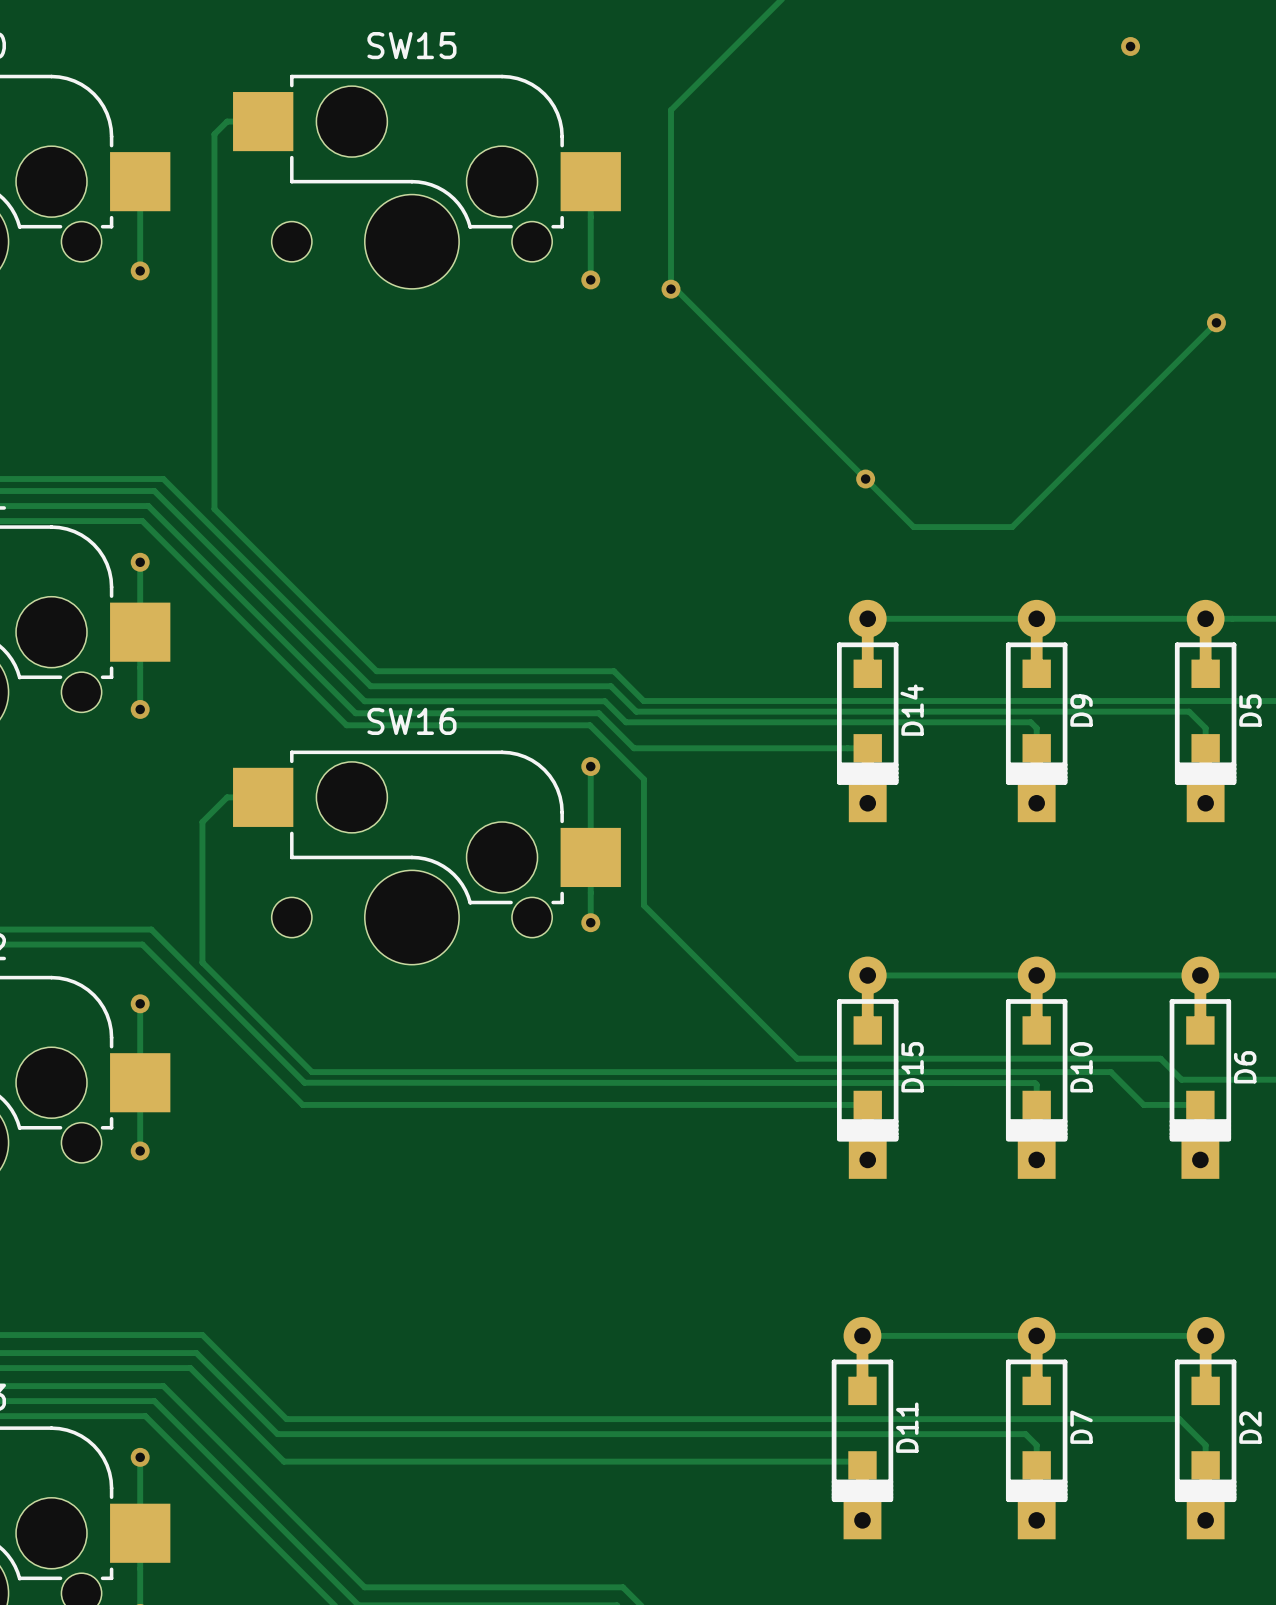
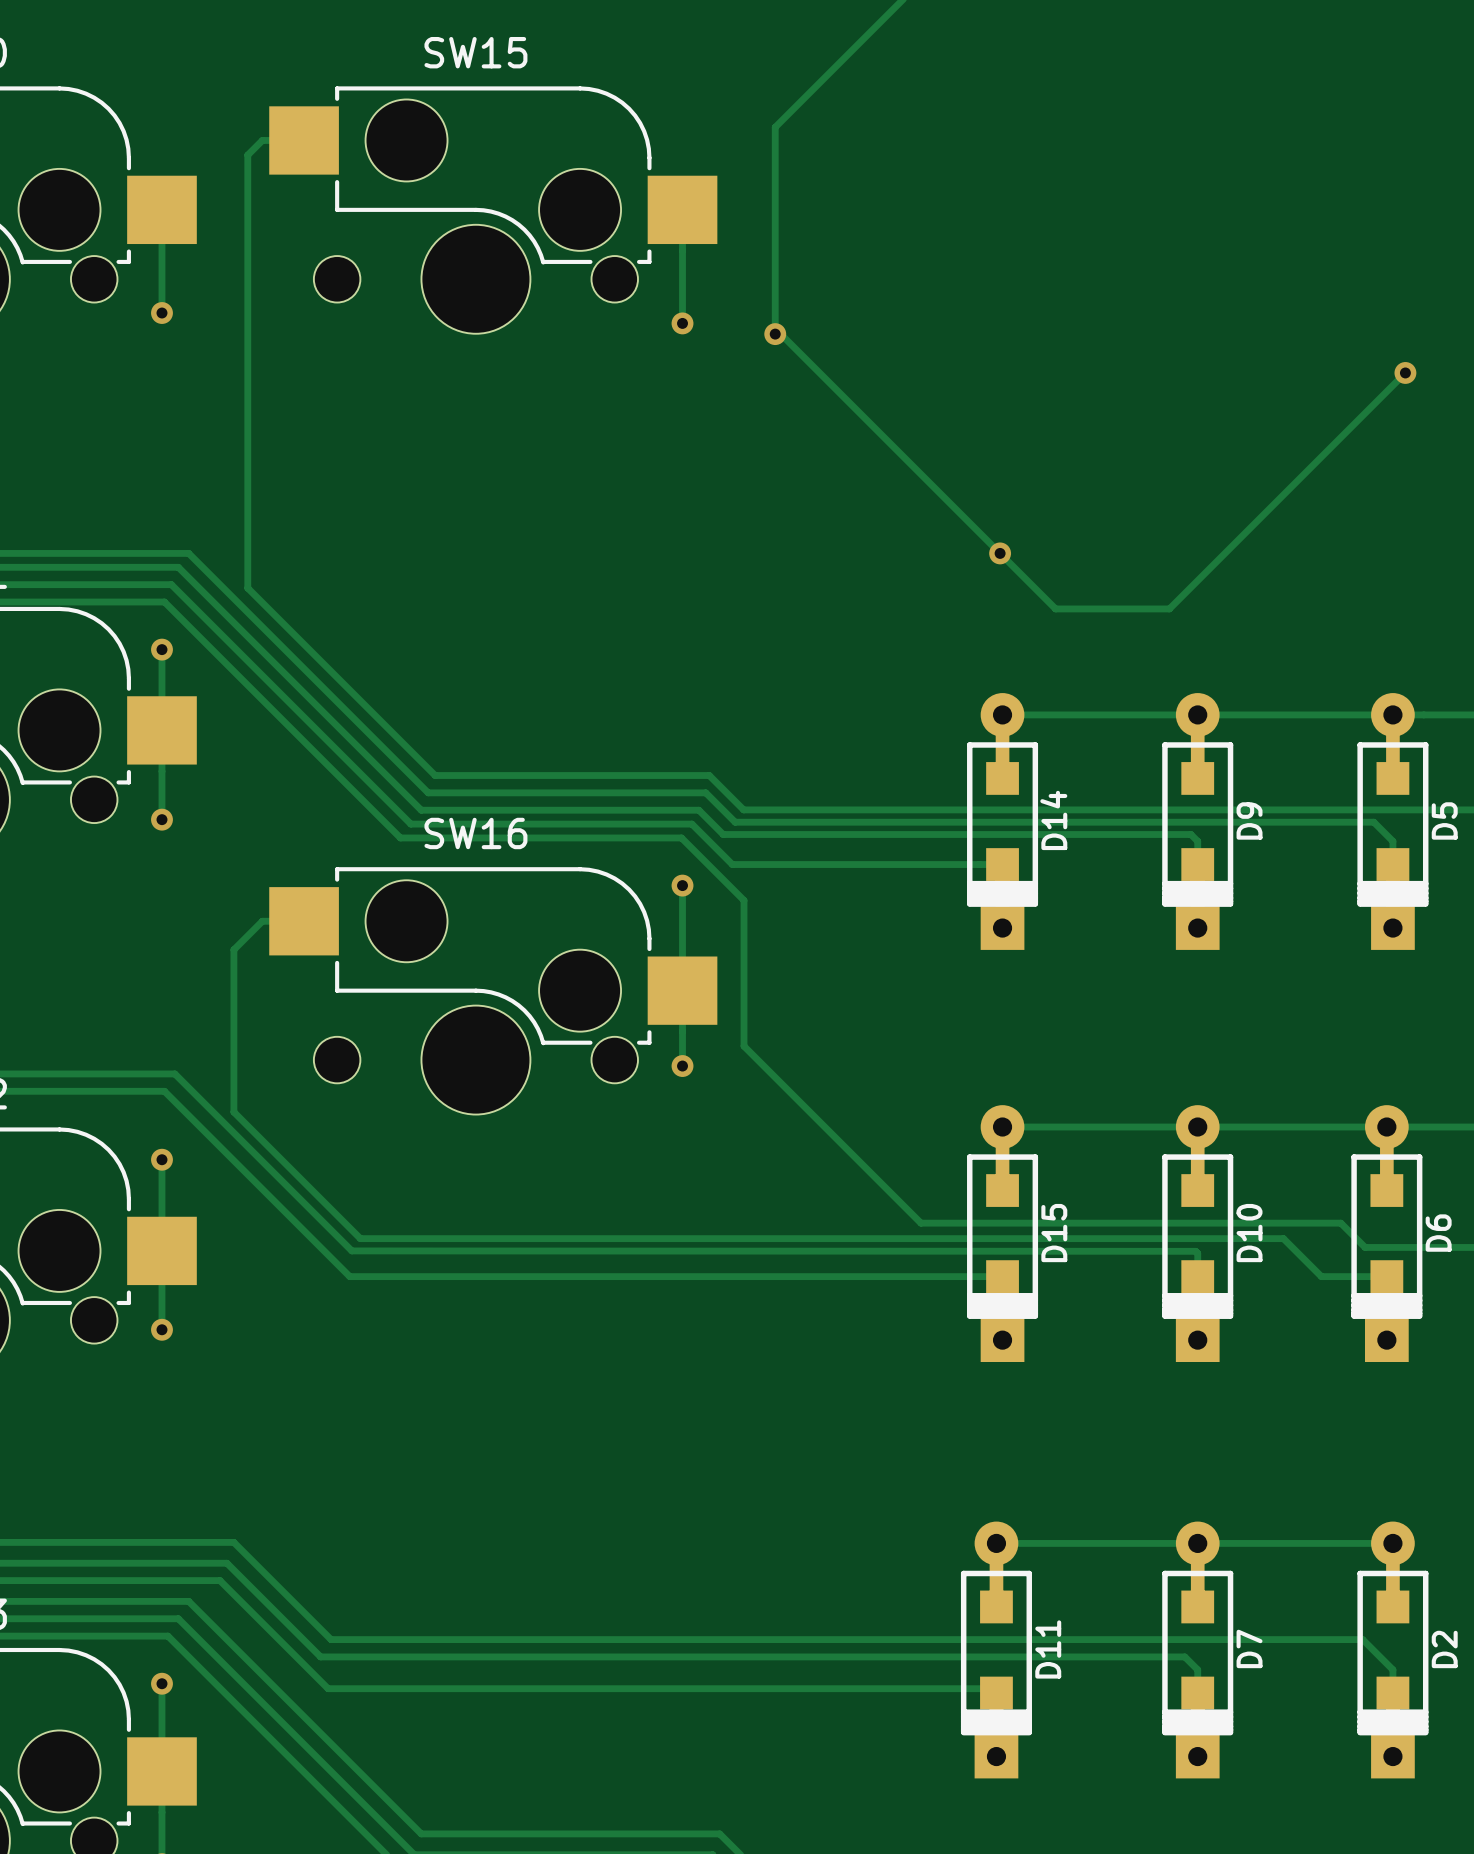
via: (1130, 46) -> none

